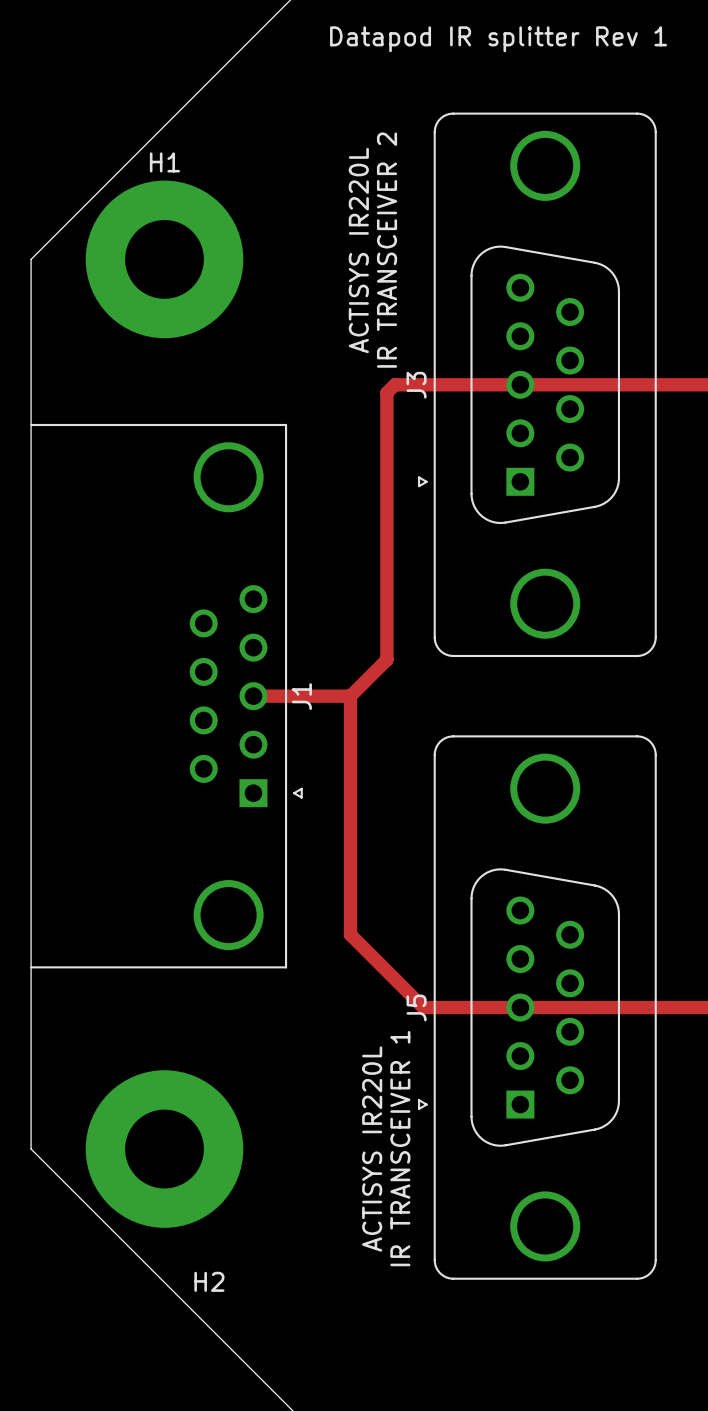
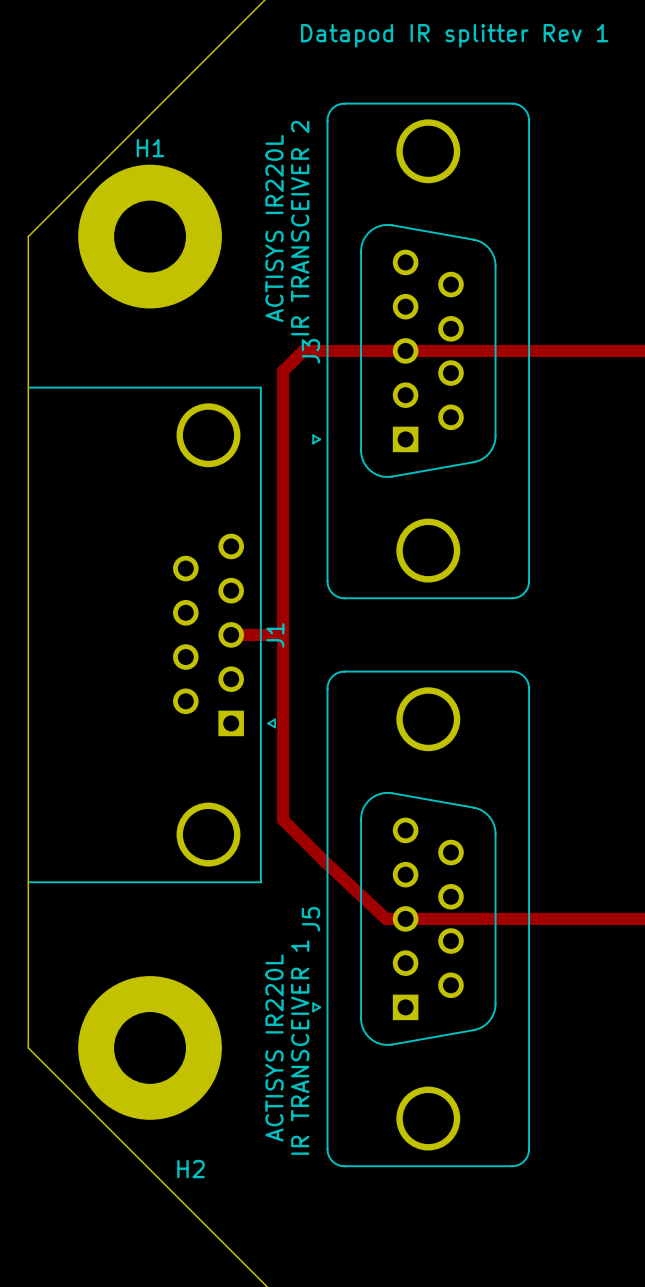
text position: ACTISYS IR220L (358, 250) -> ACTISYS IR220L (274, 228)
text position: IR TRANSCEIVER 2 (387, 250) -> IR TRANSCEIVER 2 (300, 228)
track: (394, 384) (386, 392) (386, 659) (350, 696) -> none
J3 position: (537, 384) -> (421, 350)
track: (310, 696) (350, 696) -> none
track: (350, 696) (350, 934) (423, 1007) -> (360, 350) (303, 350) (283, 371) (283, 820) (386, 918)
J5 position: (537, 1007) -> (421, 918)
text position: IR TRANSCEIVER 1 (400, 1148) -> IR TRANSCEIVER 1 (300, 1047)
text position: ACTISYS IR220L (372, 1149) -> ACTISYS IR220L (274, 1047)

